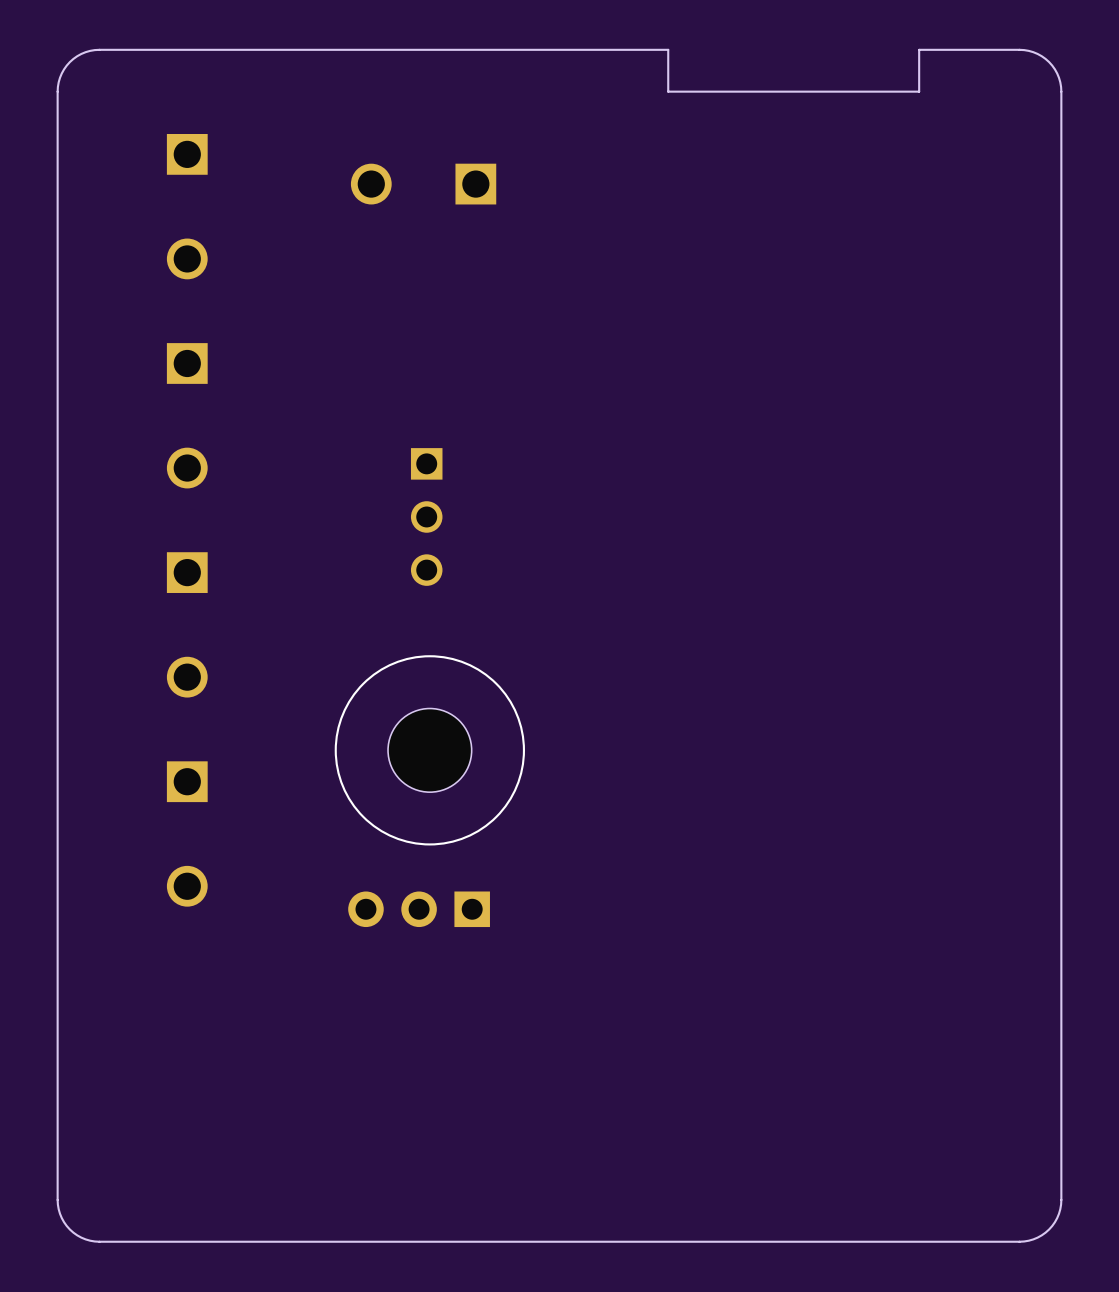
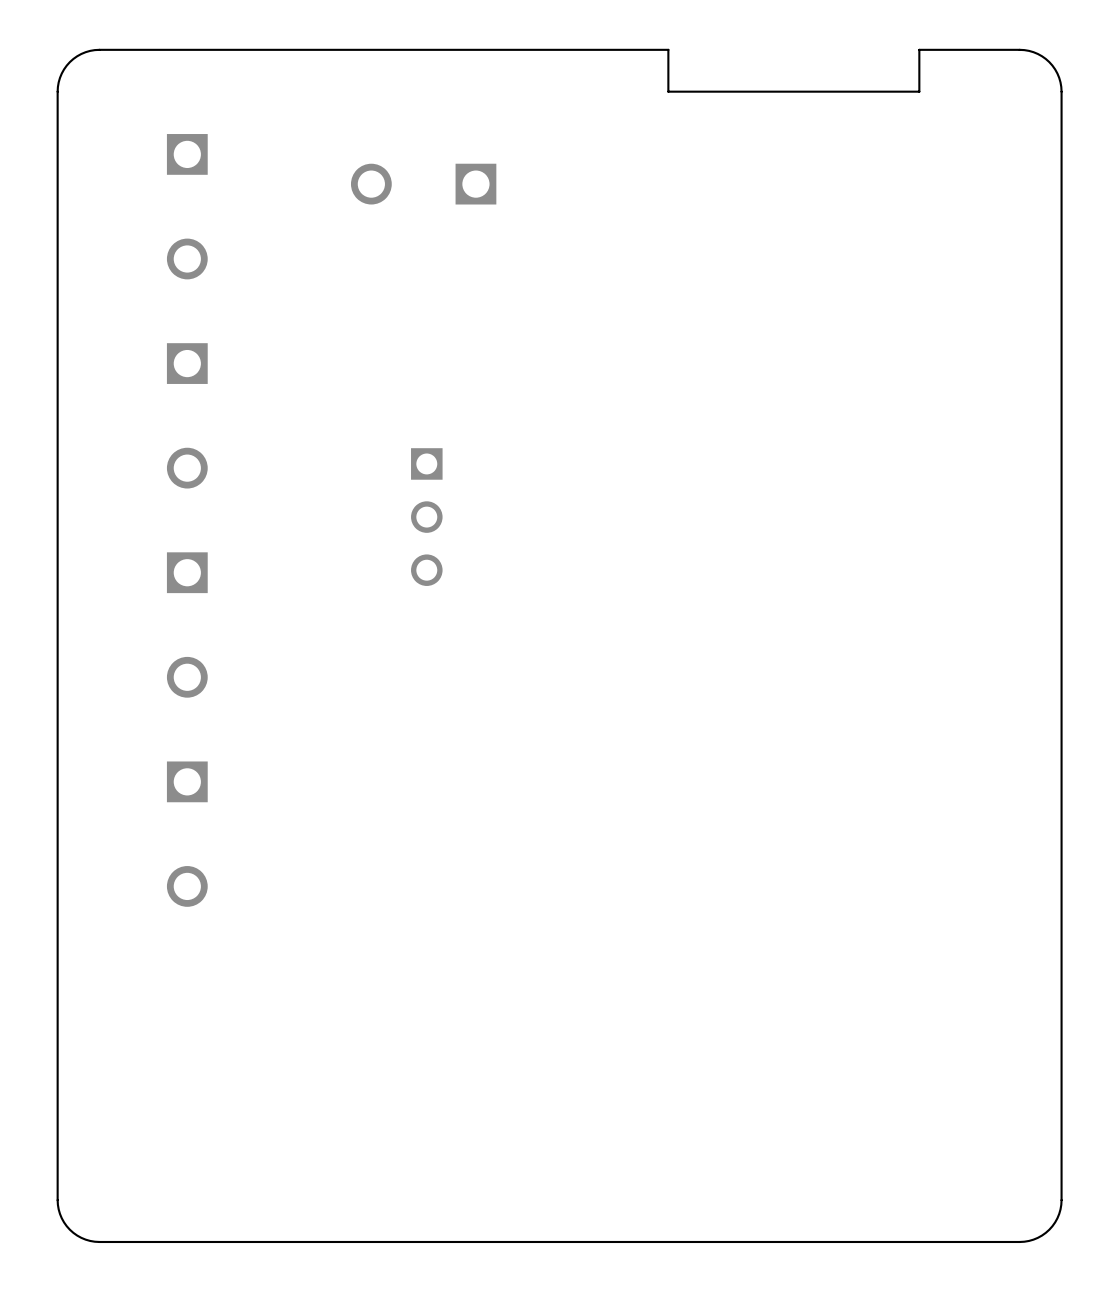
part: (429, 750) -> none
part: (419, 909) -> none

